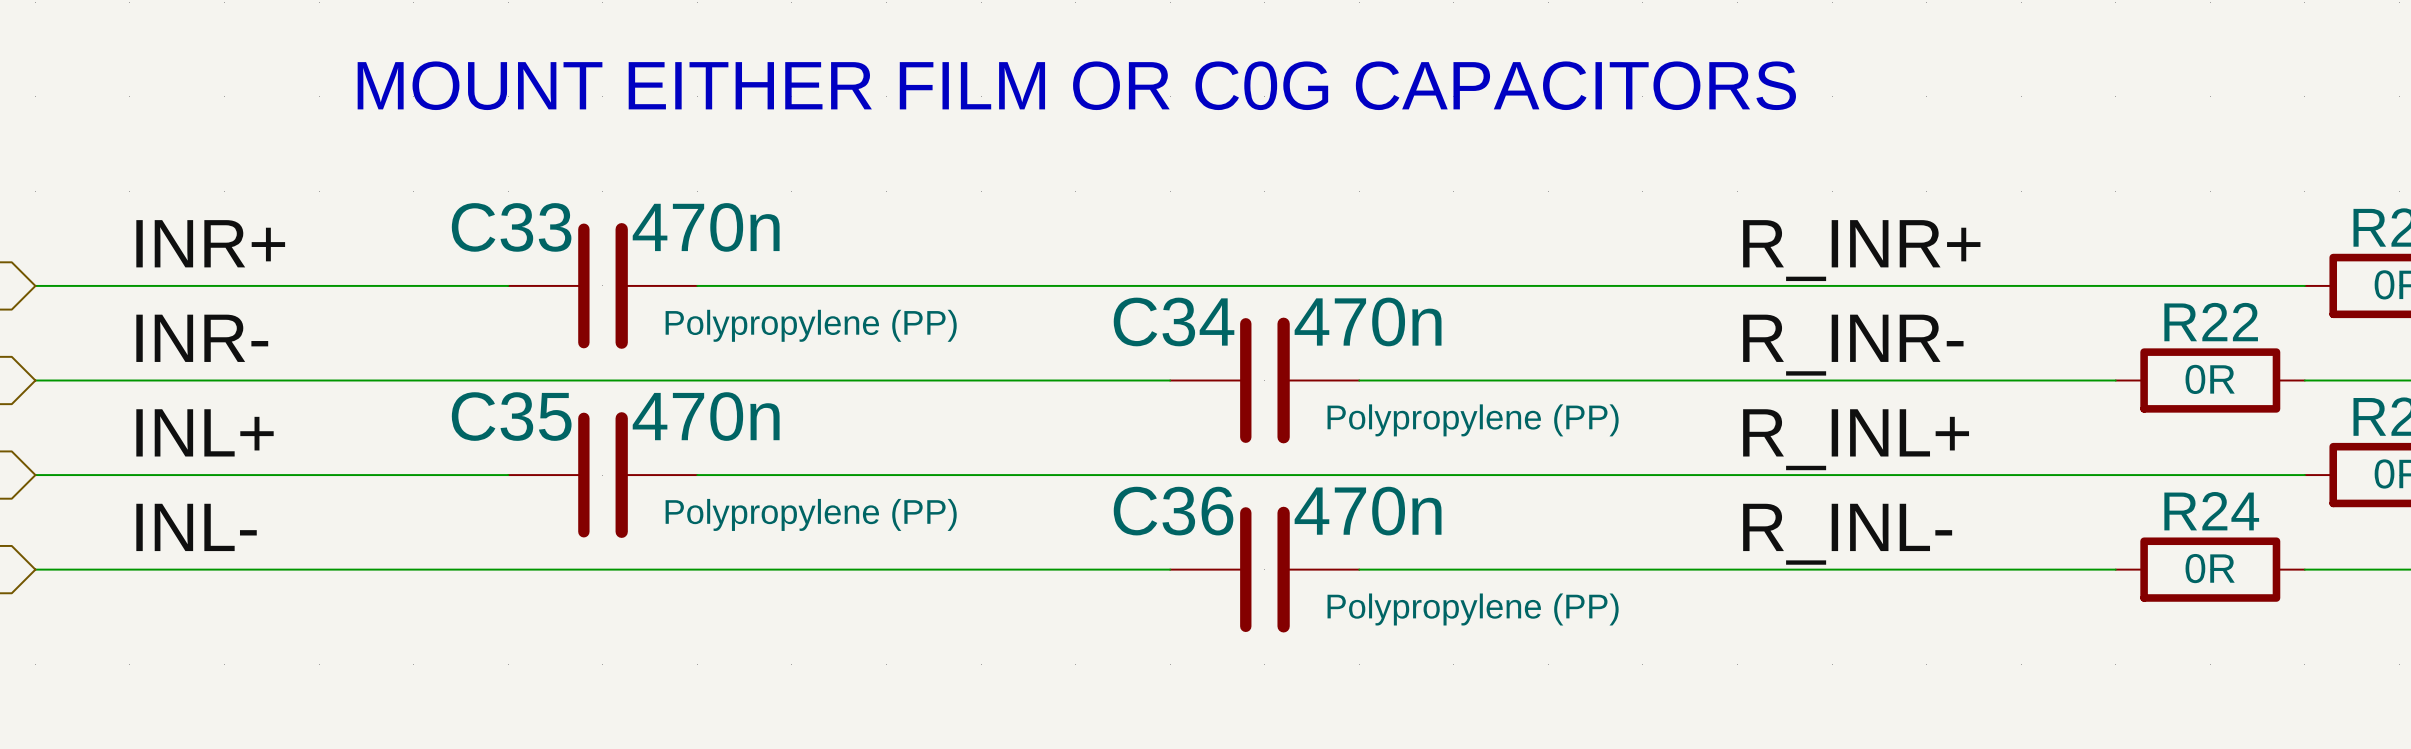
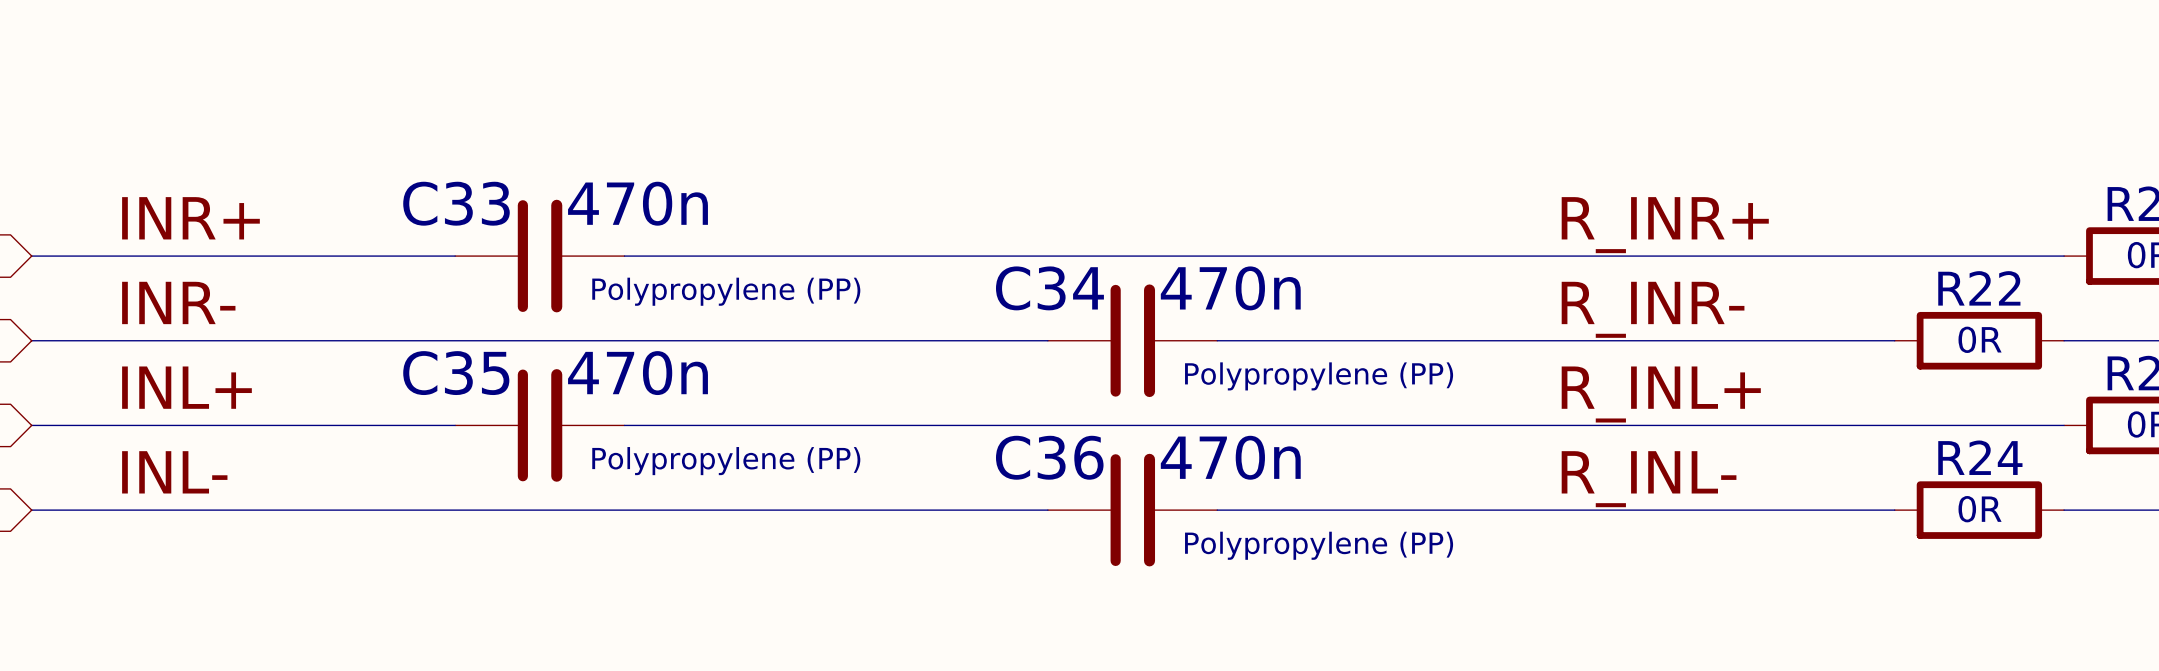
text: MOUNT EITHER FILM OR C0G CAPACITORS (1076, 85) -> none

